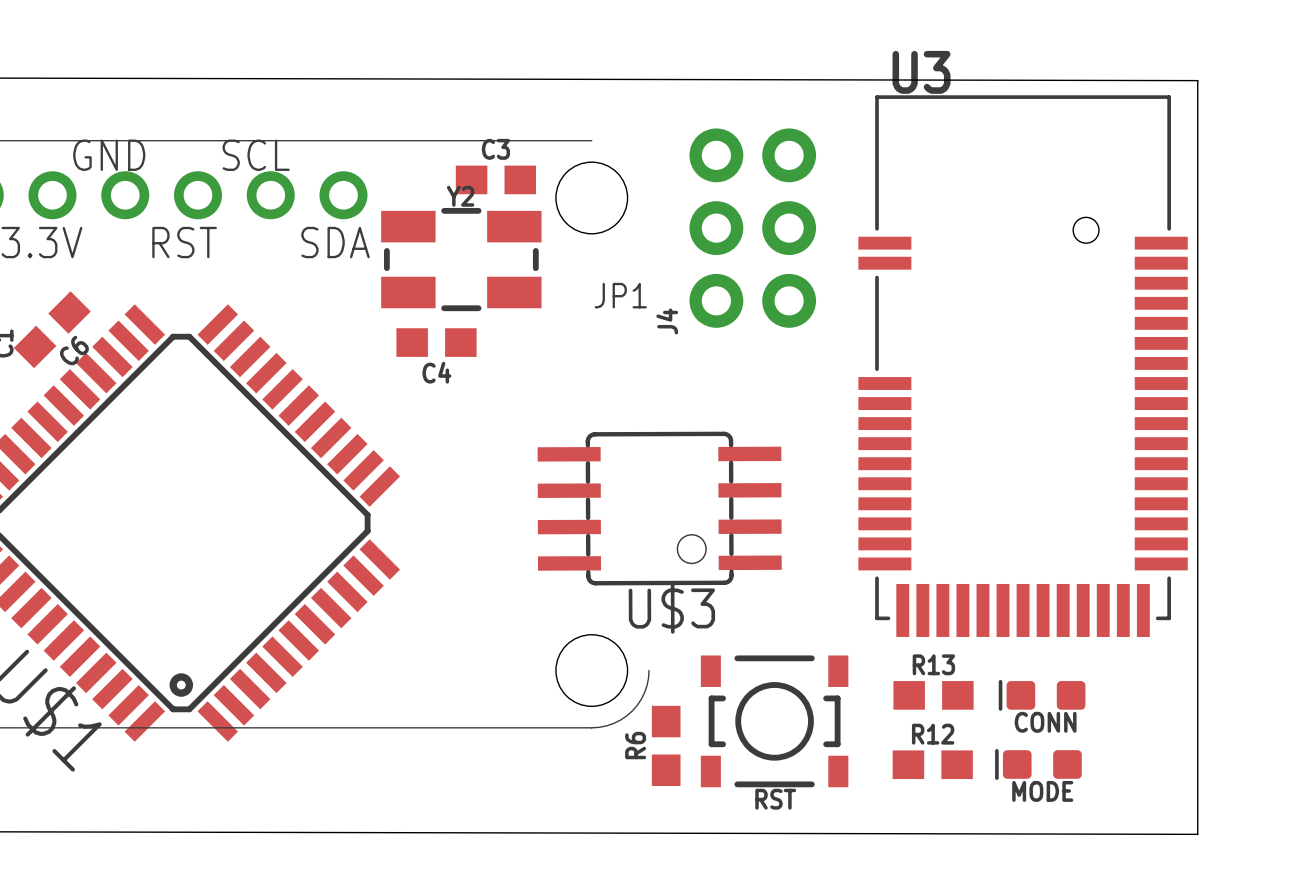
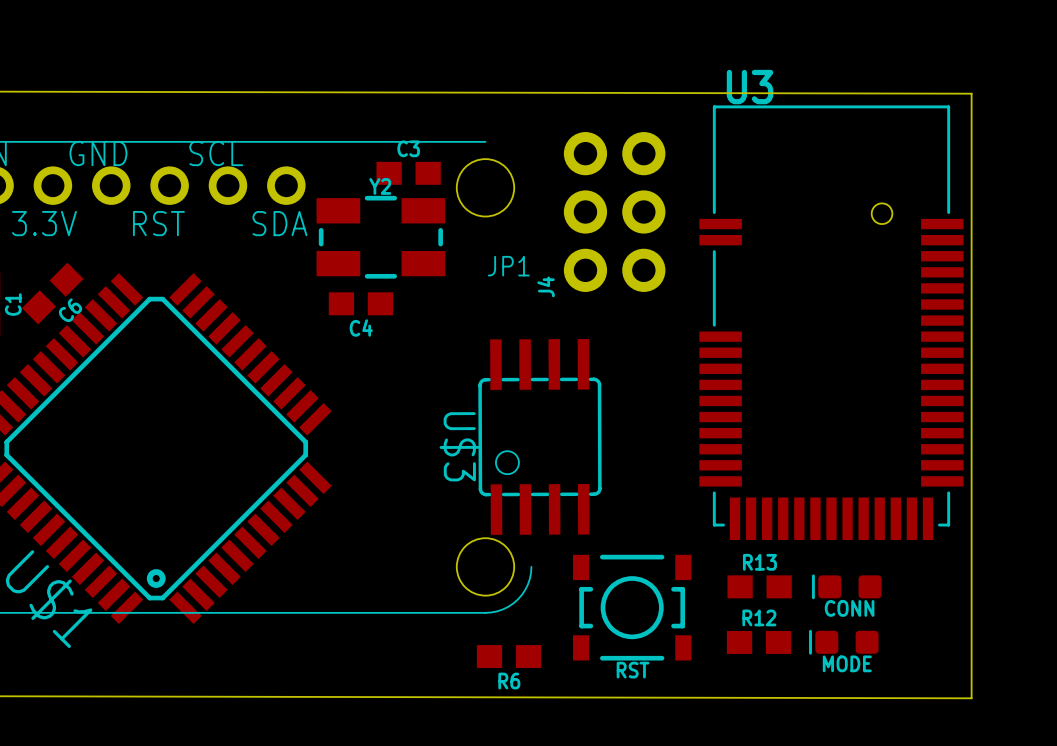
U$3 rotation: 0° (659, 508) -> 90° clockwise (539, 436)
R6 rotation: 0° (666, 745) -> 90° clockwise (509, 656)
R6 position: (666, 745) -> (509, 656)

